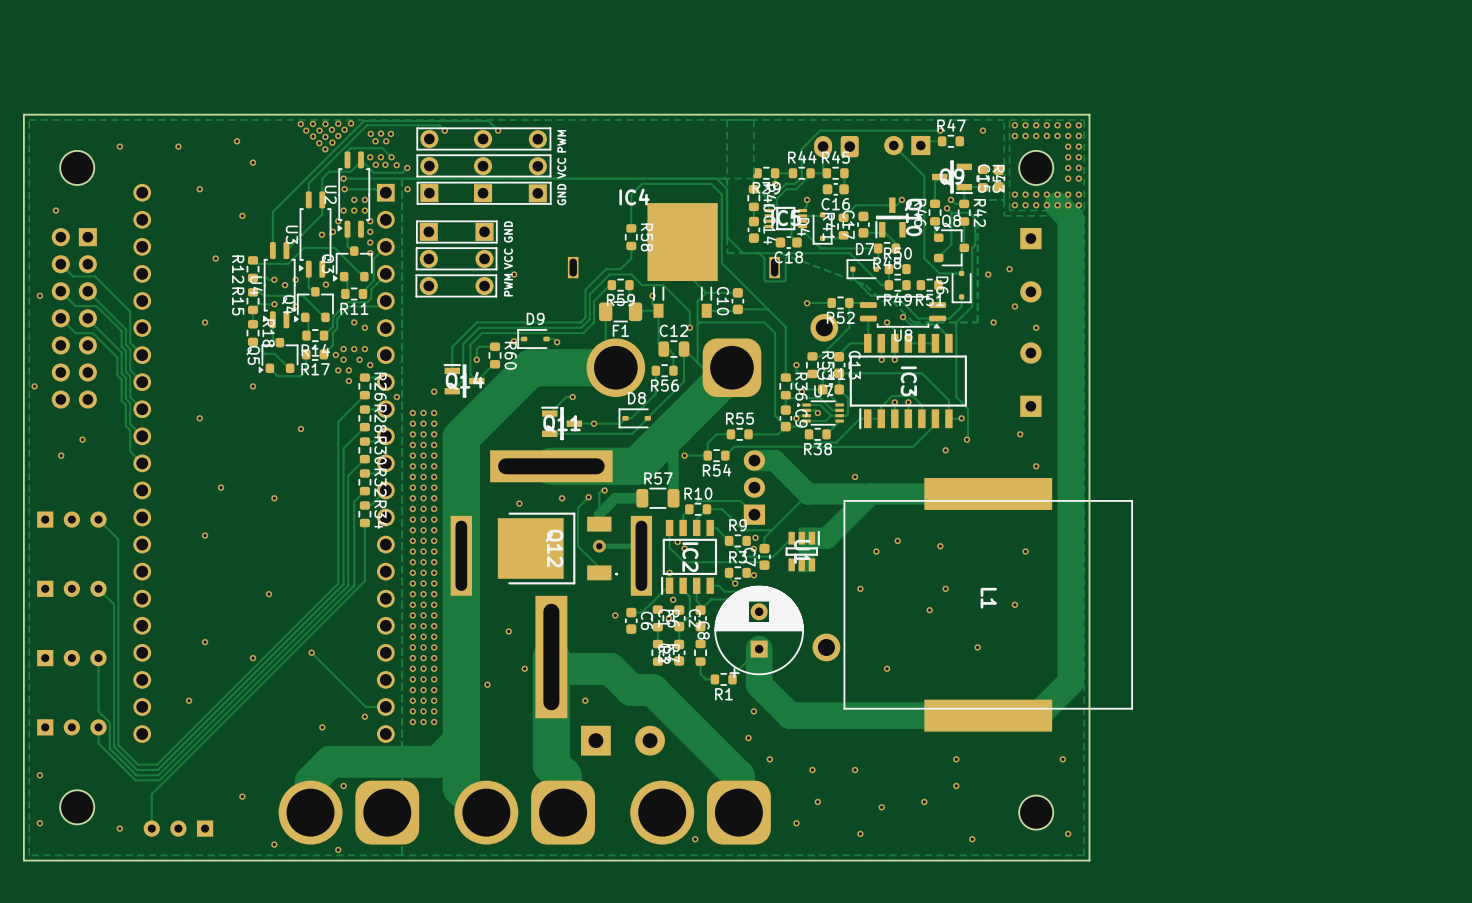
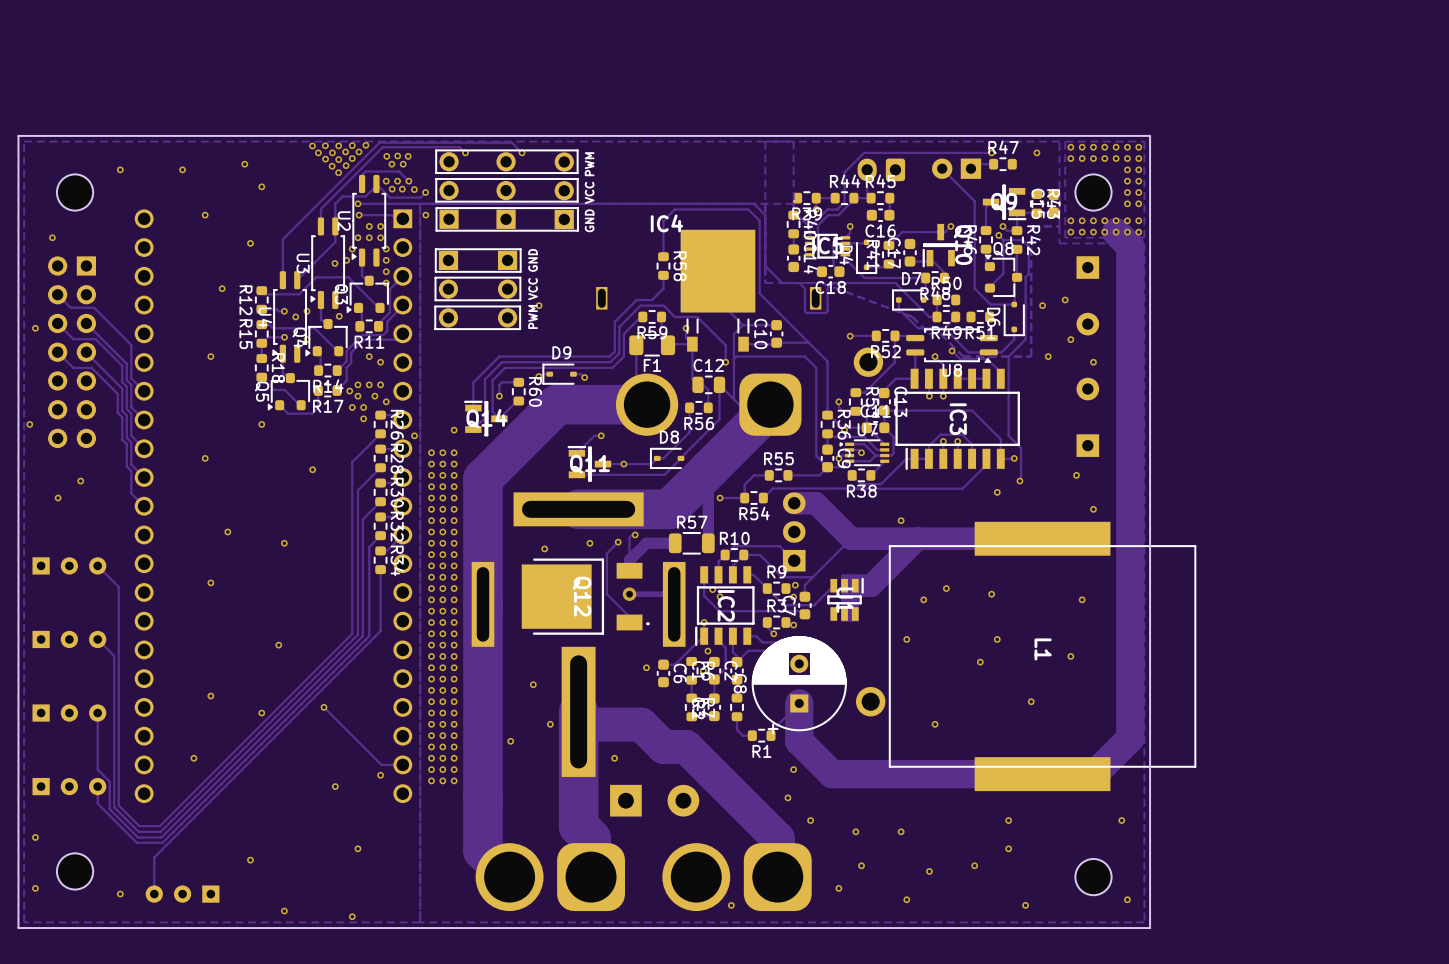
track: (461, 738) (437, 761) (330, 761) (310, 781) (310, 812) -> none
part: (348, 812) -> none

